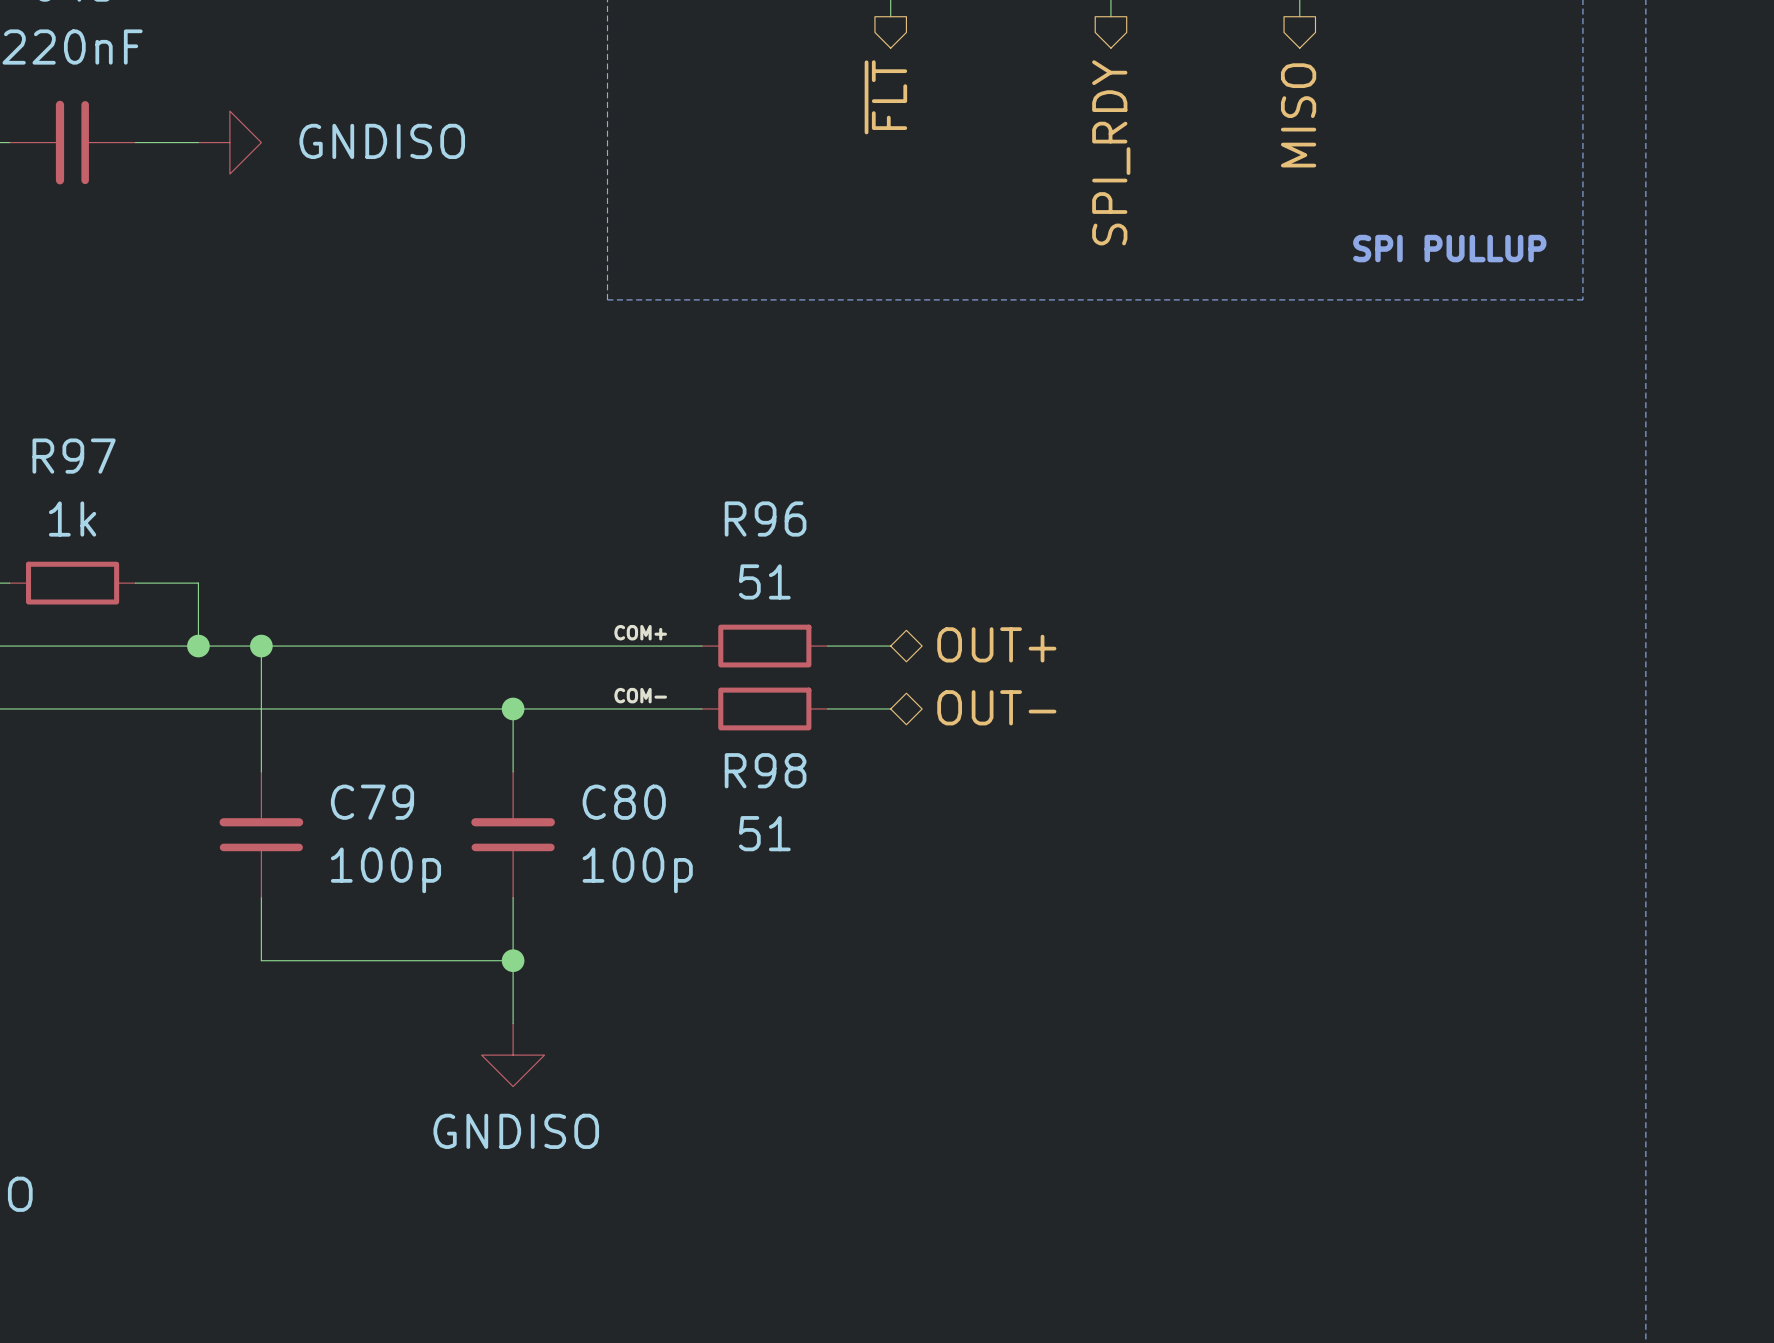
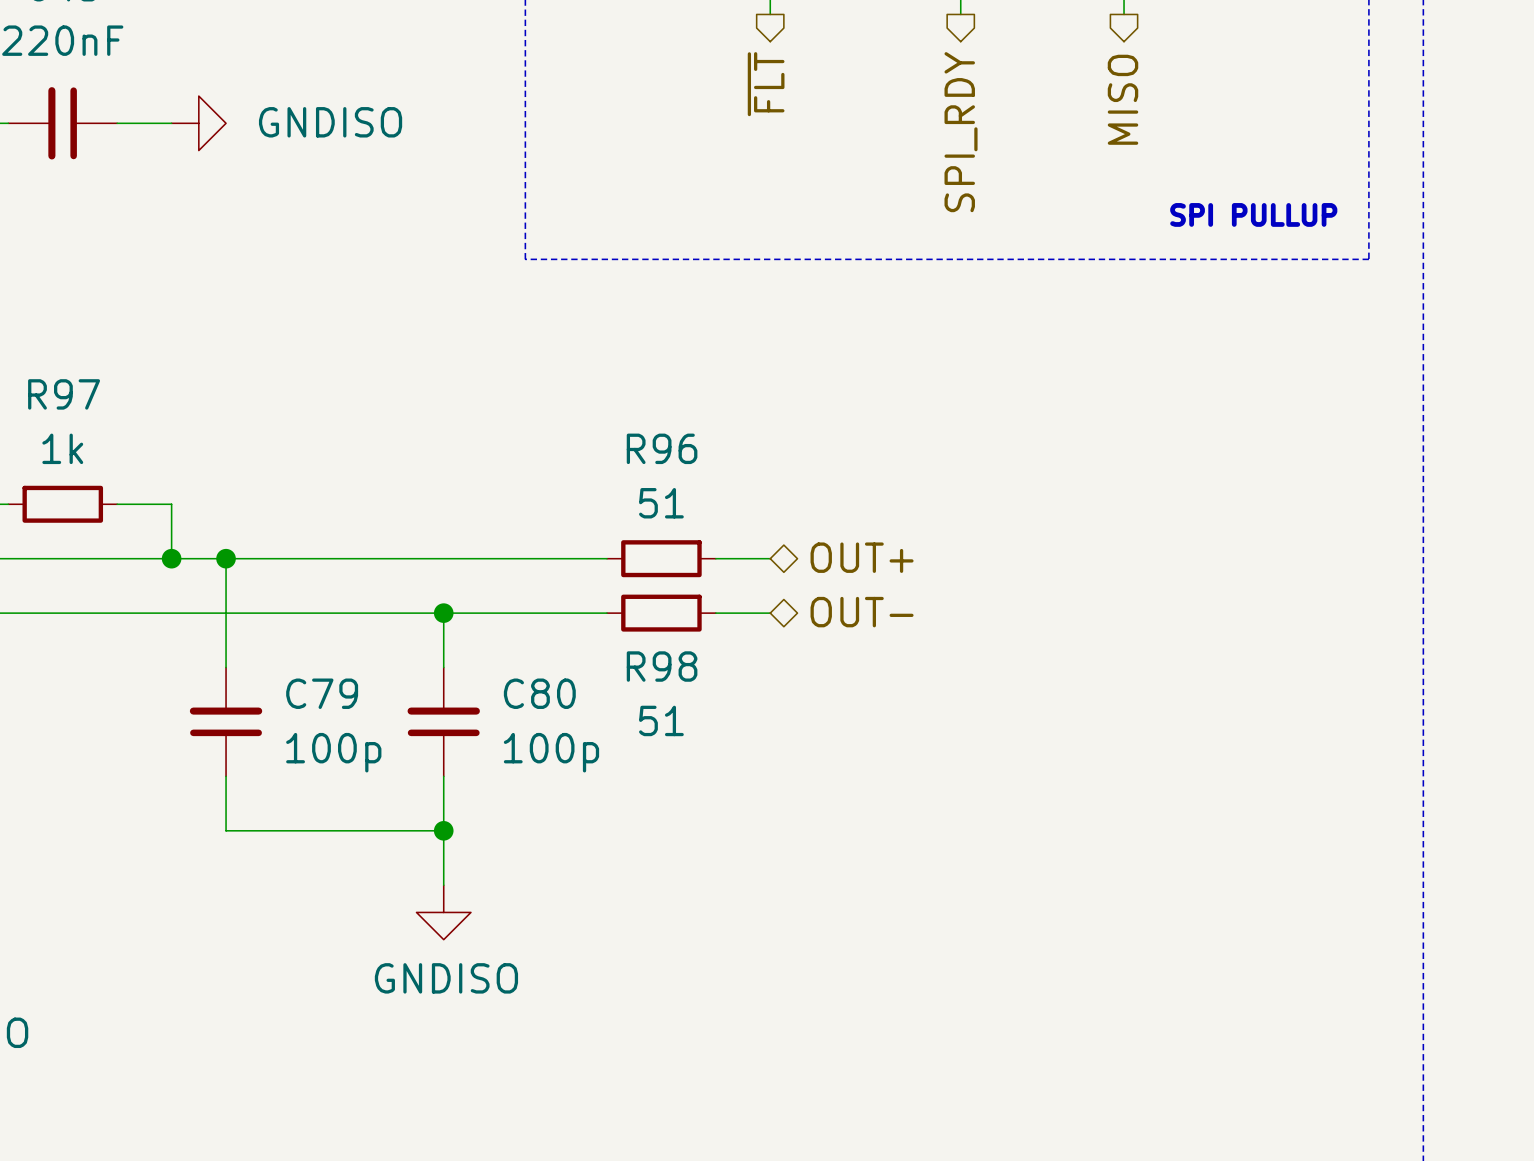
label: COM+ (640, 632) -> none
label: COM- (640, 695) -> none

